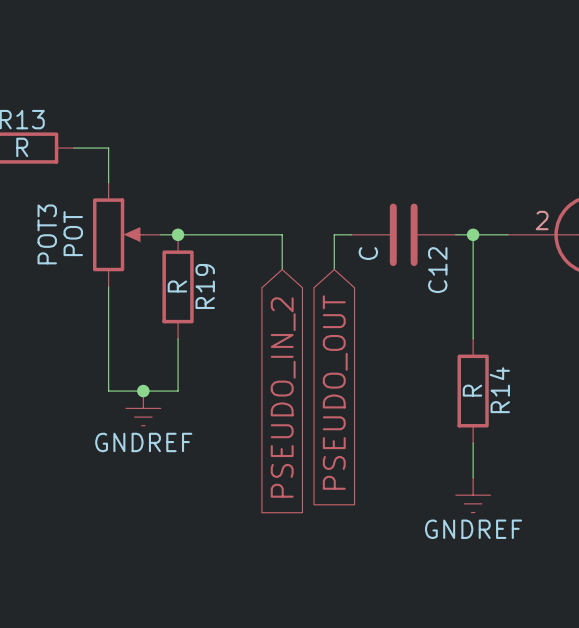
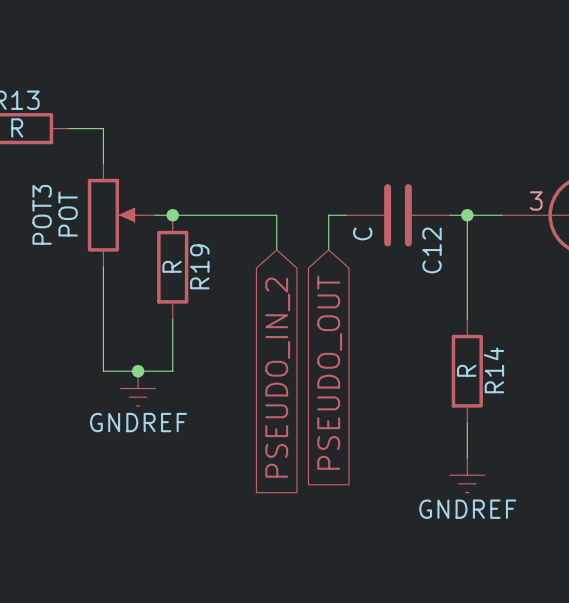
part pin number: 2 (542, 220) -> 3 (536, 200)

